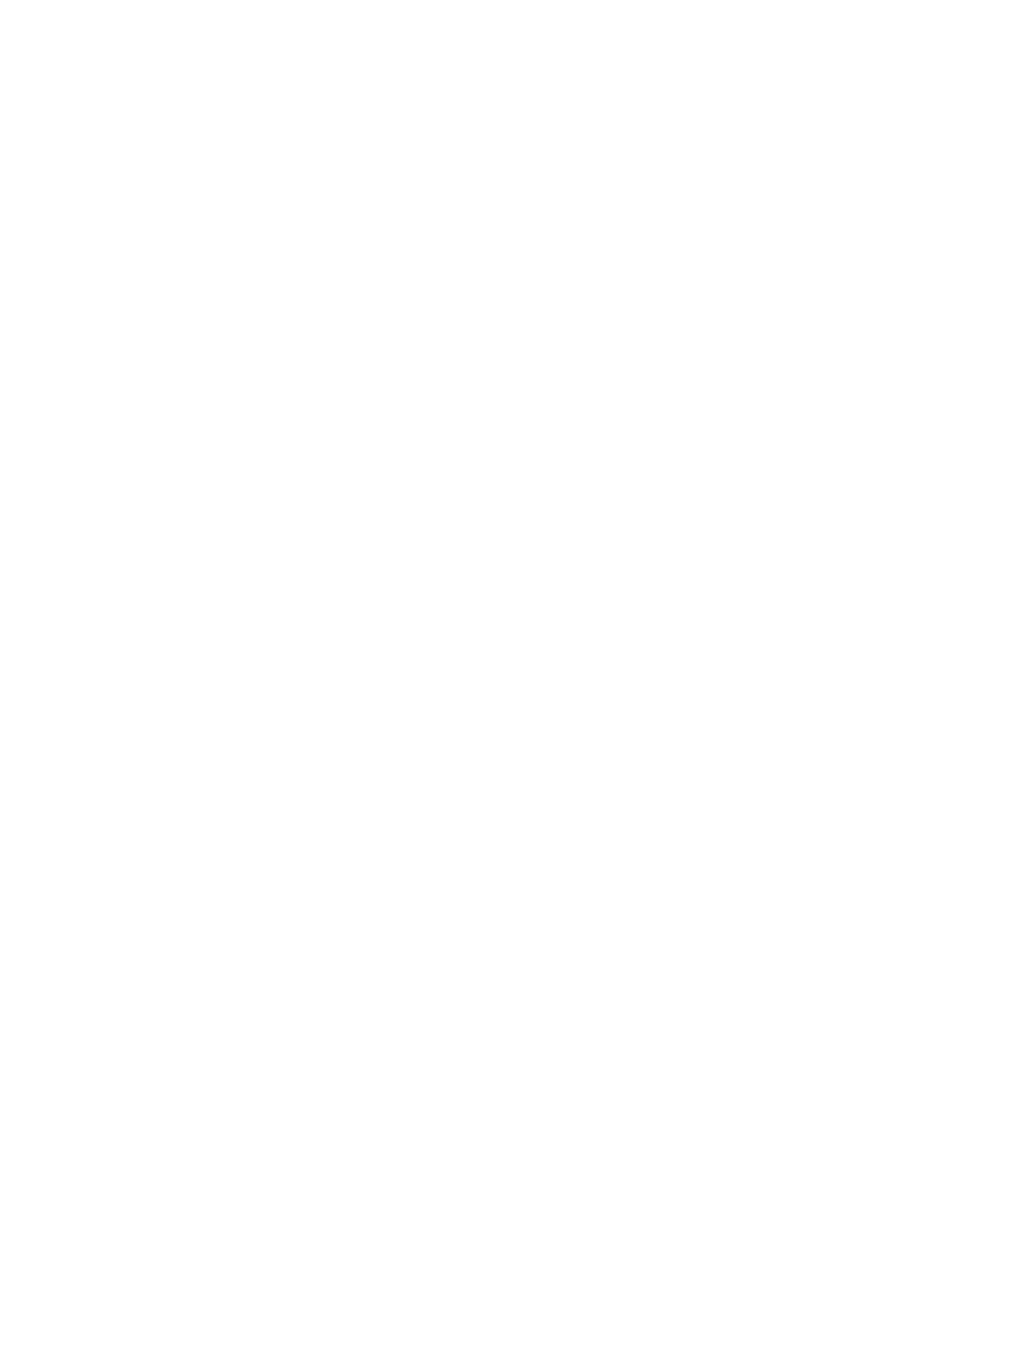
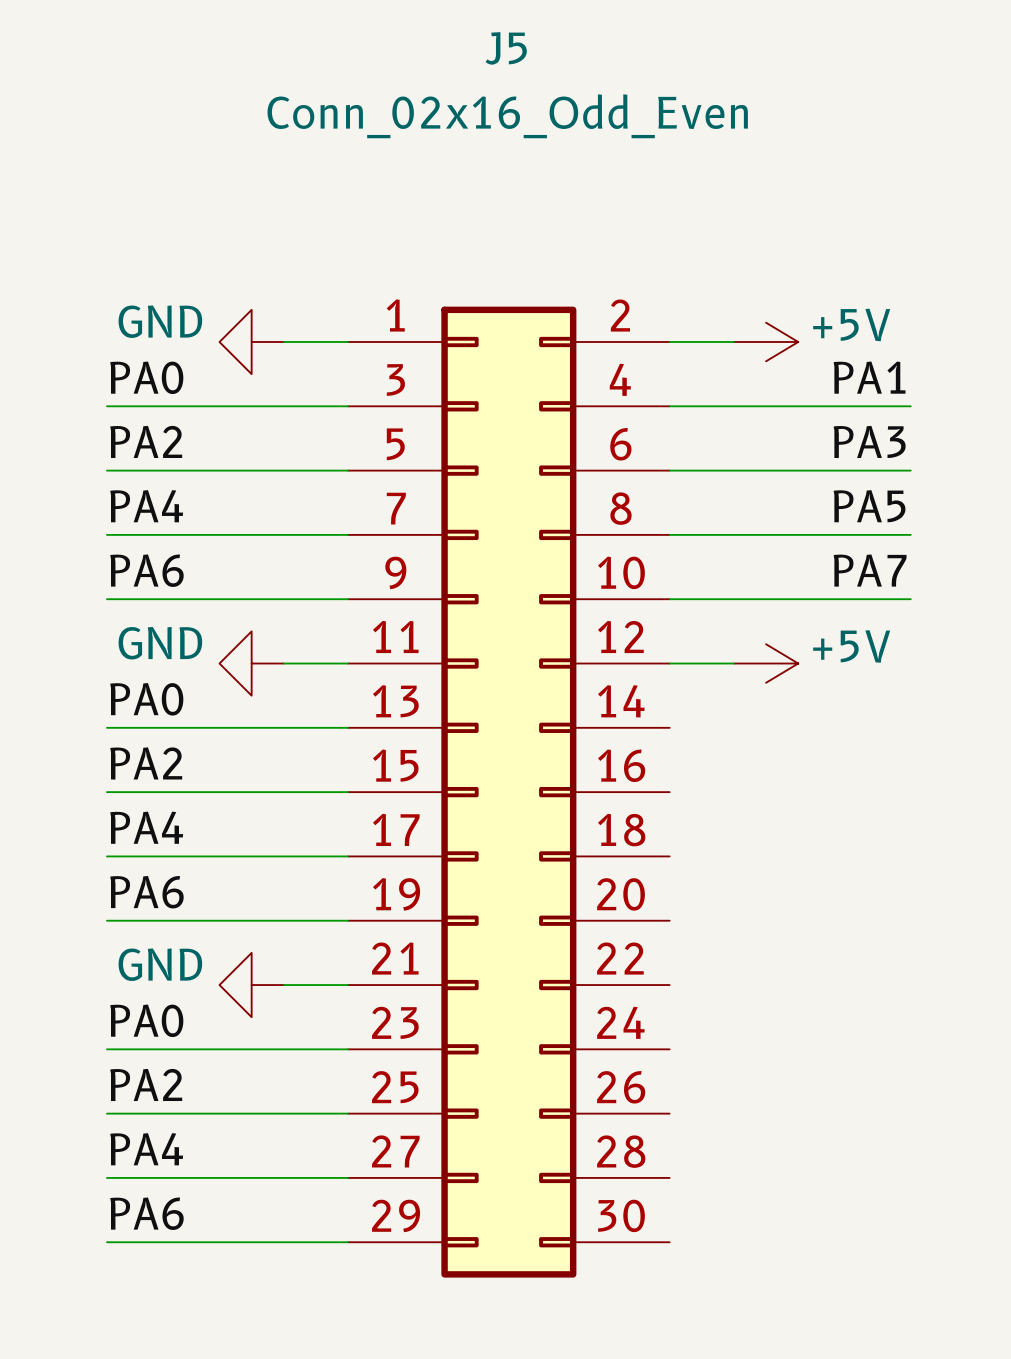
power symbol: none -> GND (251, 342)
wire: none -> (283, 342) (348, 342)
wire: none -> (669, 342) (733, 342)
power symbol: none -> +5V (766, 342)
label: none -> PA0 (146, 377)
label: none -> PA1 (869, 377)
wire: none -> (106, 406) (348, 406)
wire: none -> (669, 406) (910, 406)
label: none -> PA2 (146, 441)
label: none -> PA3 (869, 441)
wire: none -> (106, 470) (348, 470)
wire: none -> (669, 470) (910, 470)
label: none -> PA4 (146, 506)
label: none -> PA5 (869, 506)
wire: none -> (106, 534) (348, 534)
wire: none -> (669, 534) (910, 534)
label: none -> PA6 (146, 570)
label: none -> PA7 (870, 570)
wire: none -> (106, 599) (348, 599)
wire: none -> (669, 599) (910, 599)
power symbol: none -> GND (251, 663)
wire: none -> (283, 663) (348, 663)
wire: none -> (669, 663) (733, 663)
power symbol: none -> +5V (766, 663)
label: none -> PA0 (146, 699)
wire: none -> (106, 727) (348, 727)
label: none -> PA2 (146, 763)
wire: none -> (106, 792) (348, 792)
J5: none -> Conn_02x16_Odd_Even (508, 792)
label: none -> PA4 (146, 827)
wire: none -> (106, 856) (348, 856)
label: none -> PA6 (146, 892)
wire: none -> (106, 920) (348, 920)
power symbol: none -> GND (251, 985)
wire: none -> (283, 985) (348, 985)
label: none -> PA0 (146, 1020)
wire: none -> (106, 1049) (348, 1049)
label: none -> PA2 (146, 1084)
wire: none -> (106, 1113) (348, 1113)
label: none -> PA4 (146, 1149)
wire: none -> (106, 1177) (348, 1177)
label: none -> PA6 (146, 1213)
wire: none -> (106, 1242) (348, 1242)

